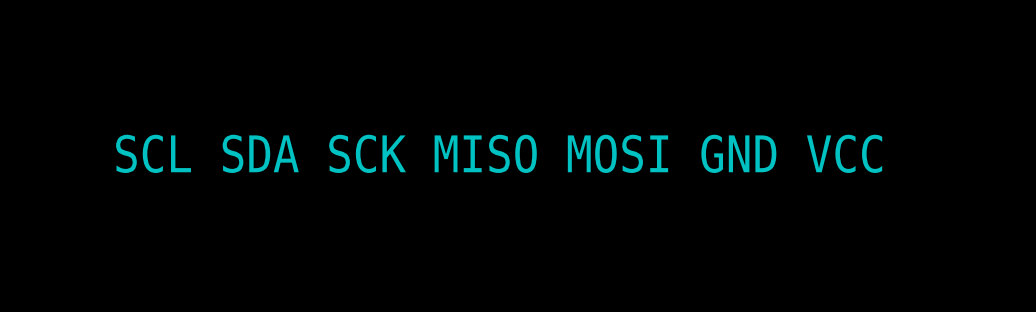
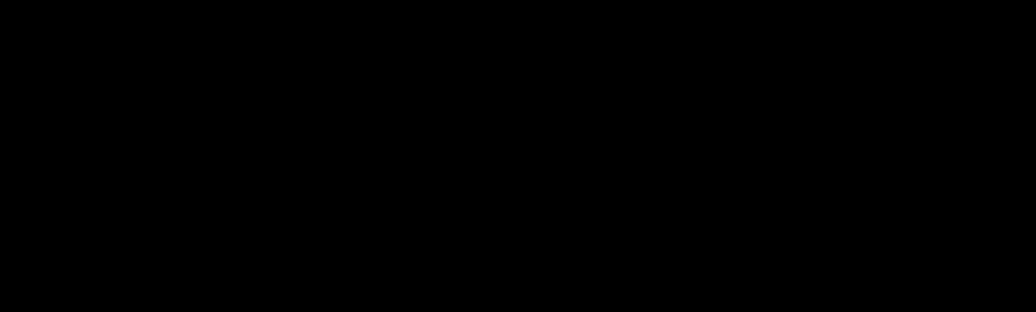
text: SCL SDA SCK MISO MOSI GND VCC (499, 153) -> none

